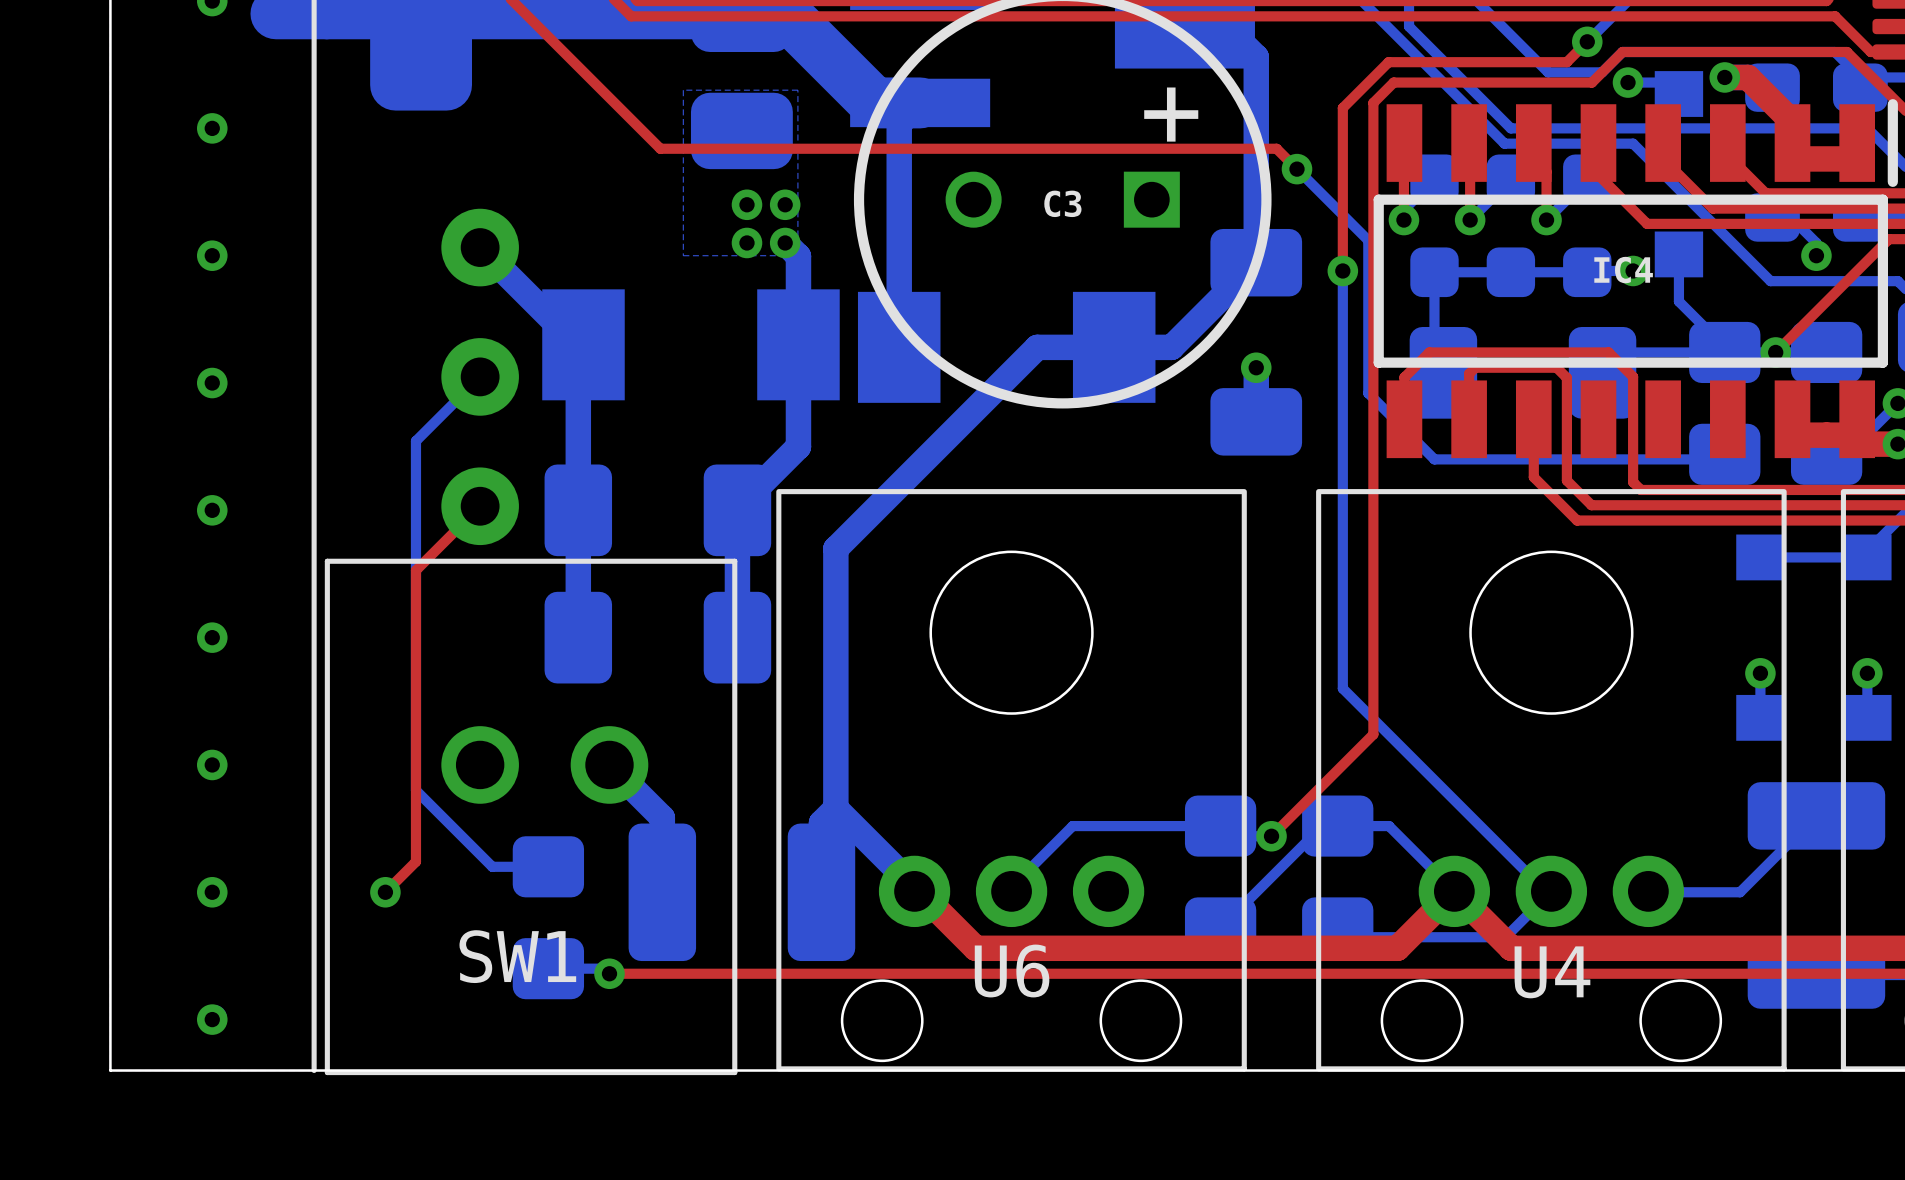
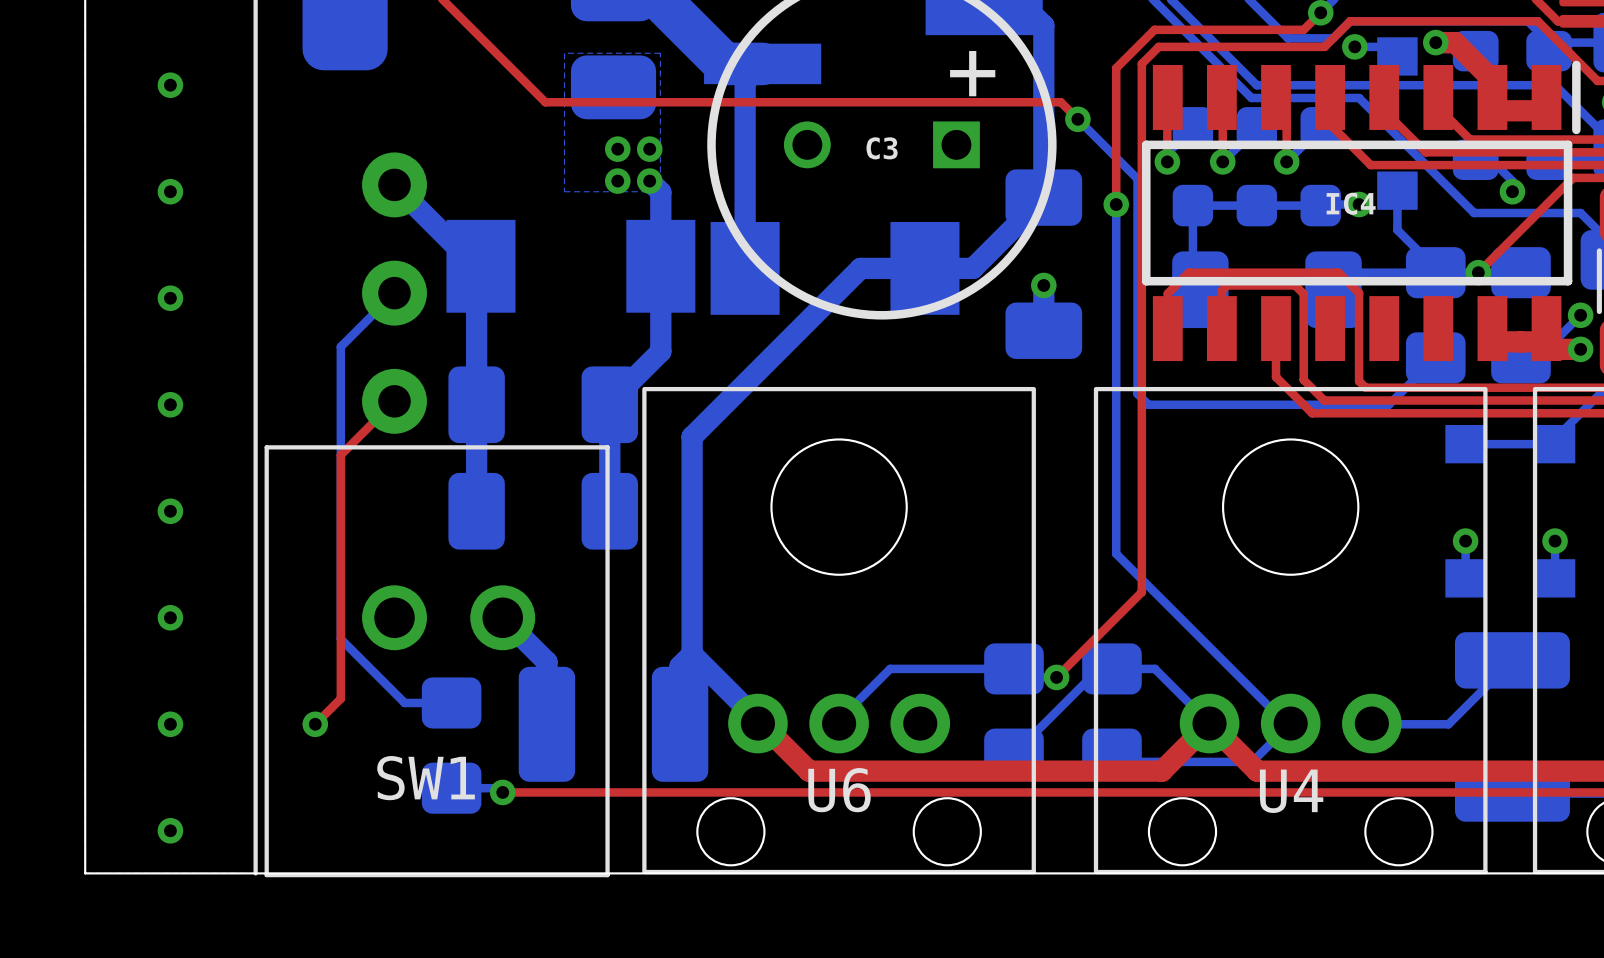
bottom track: (1368, 393) (1434, 459) (1719, 459) -> (1137, 306) (1137, 393) (1148, 404) (1388, 404) (1431, 362)

